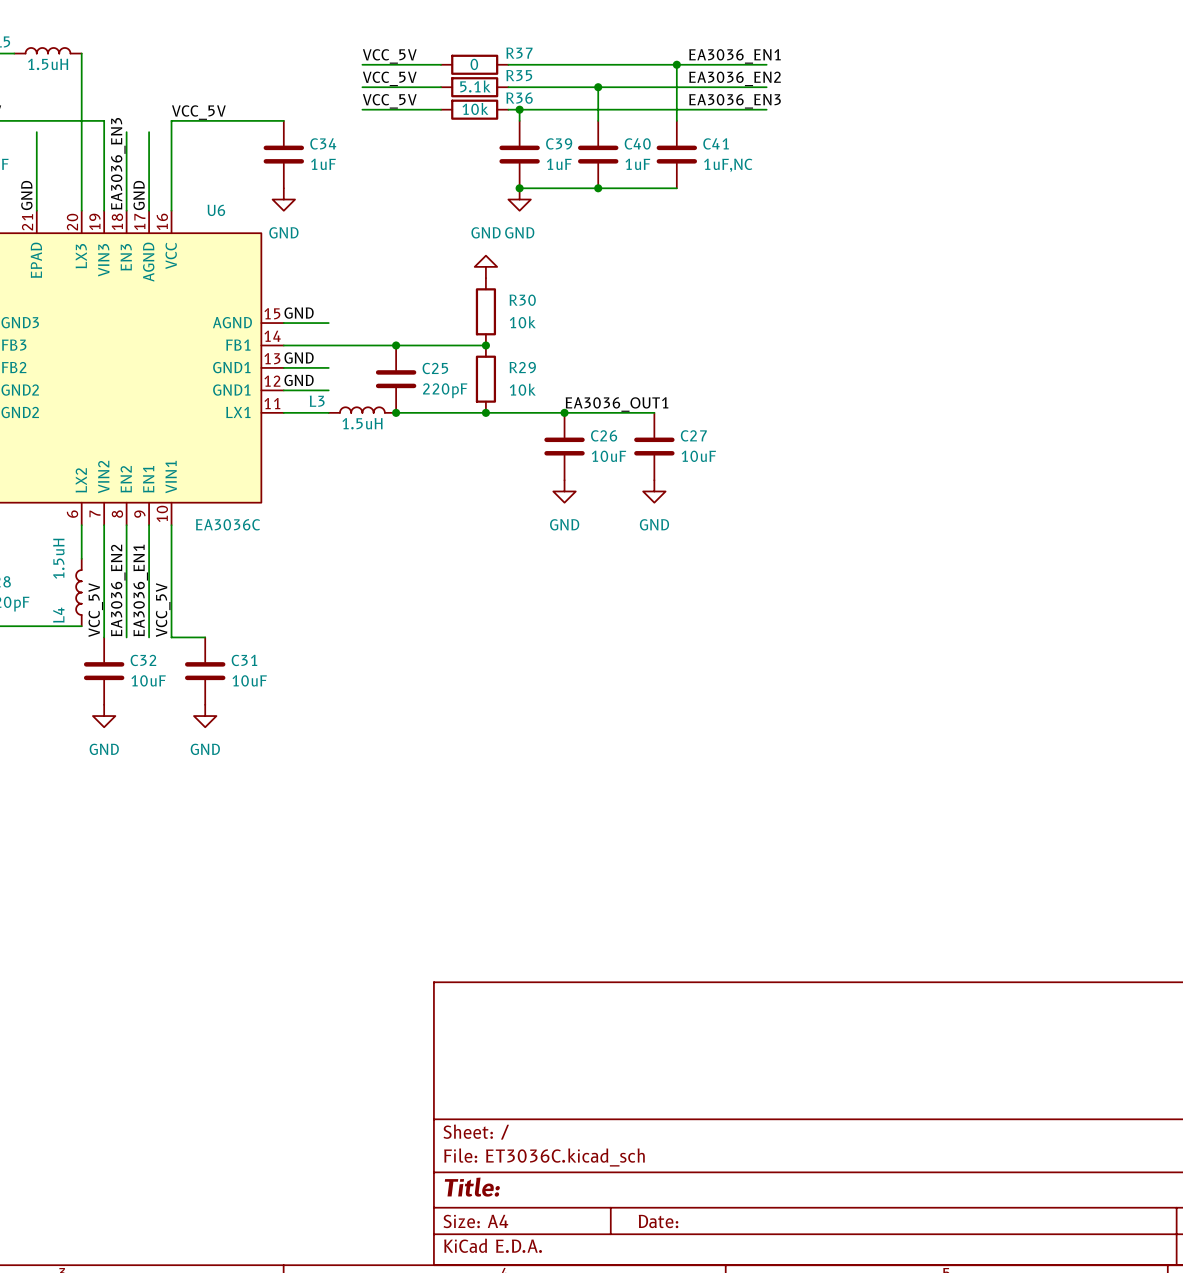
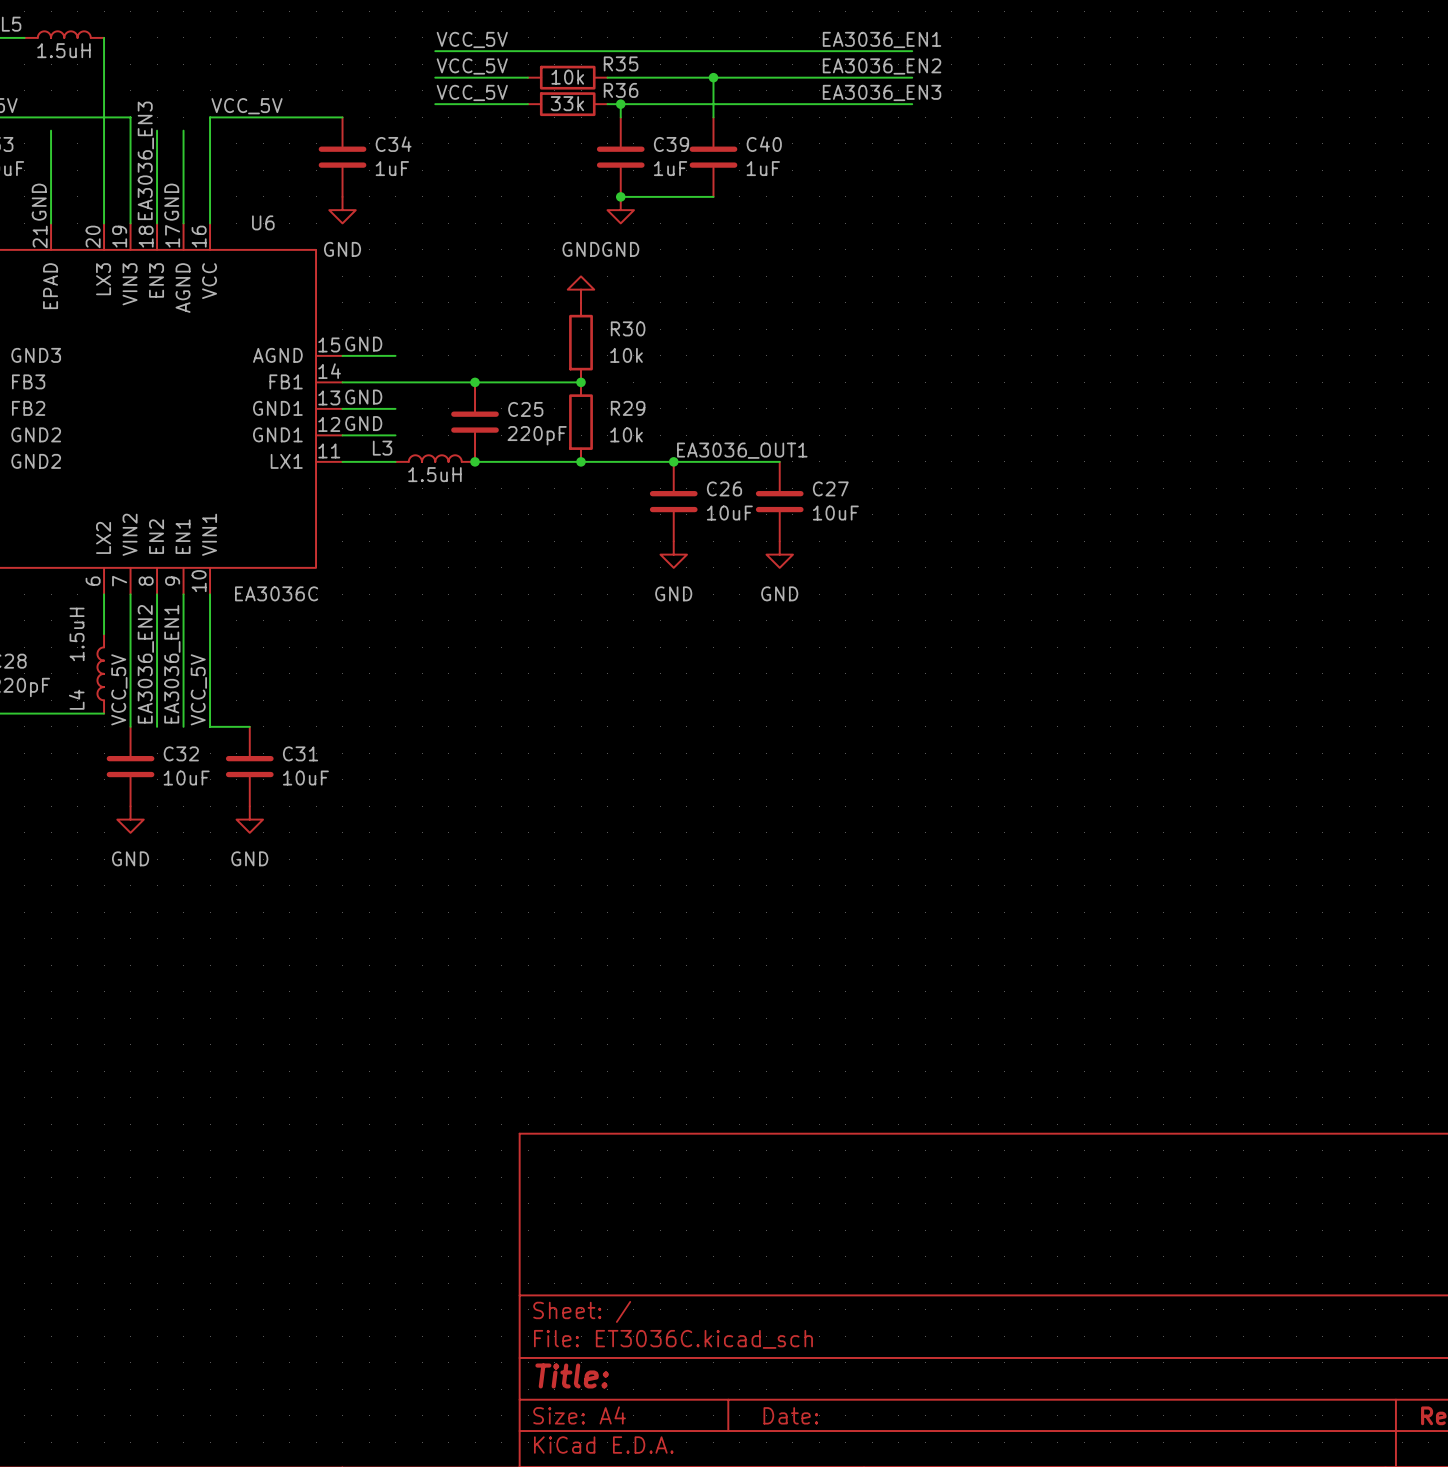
wire: none -> (528, 51) (607, 51)
R37: 0 (474, 64) -> none
wire: (676, 64) (676, 120) -> none
junction: (676, 64) -> none
R35 value: 5.1k (475, 86) -> 10k (567, 77)
R36 value: 10k (475, 108) -> 33k (567, 103)
C41: 1uF,NC (676, 154) -> none
wire: (598, 188) (676, 188) -> none
junction: (598, 188) -> none

